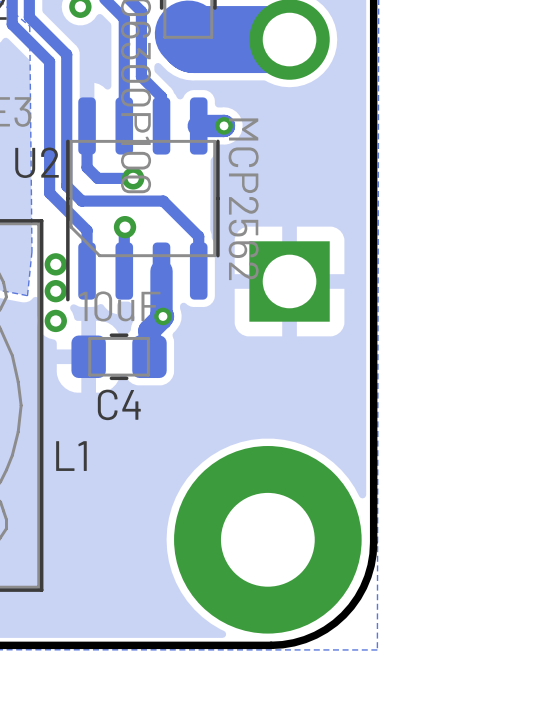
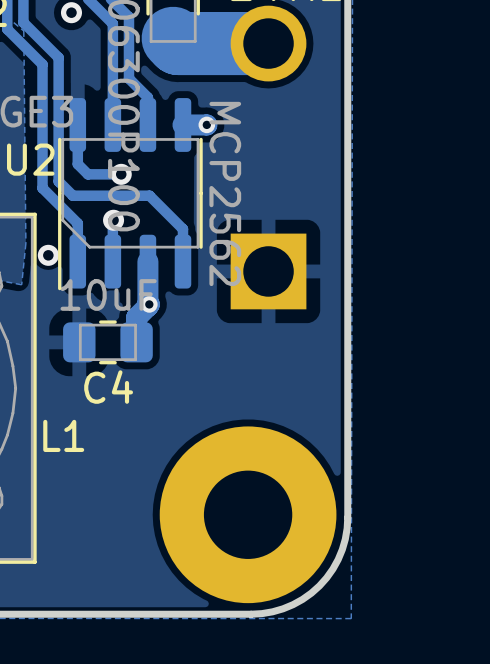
via: (55, 291) -> none
via: (55, 320) -> none

